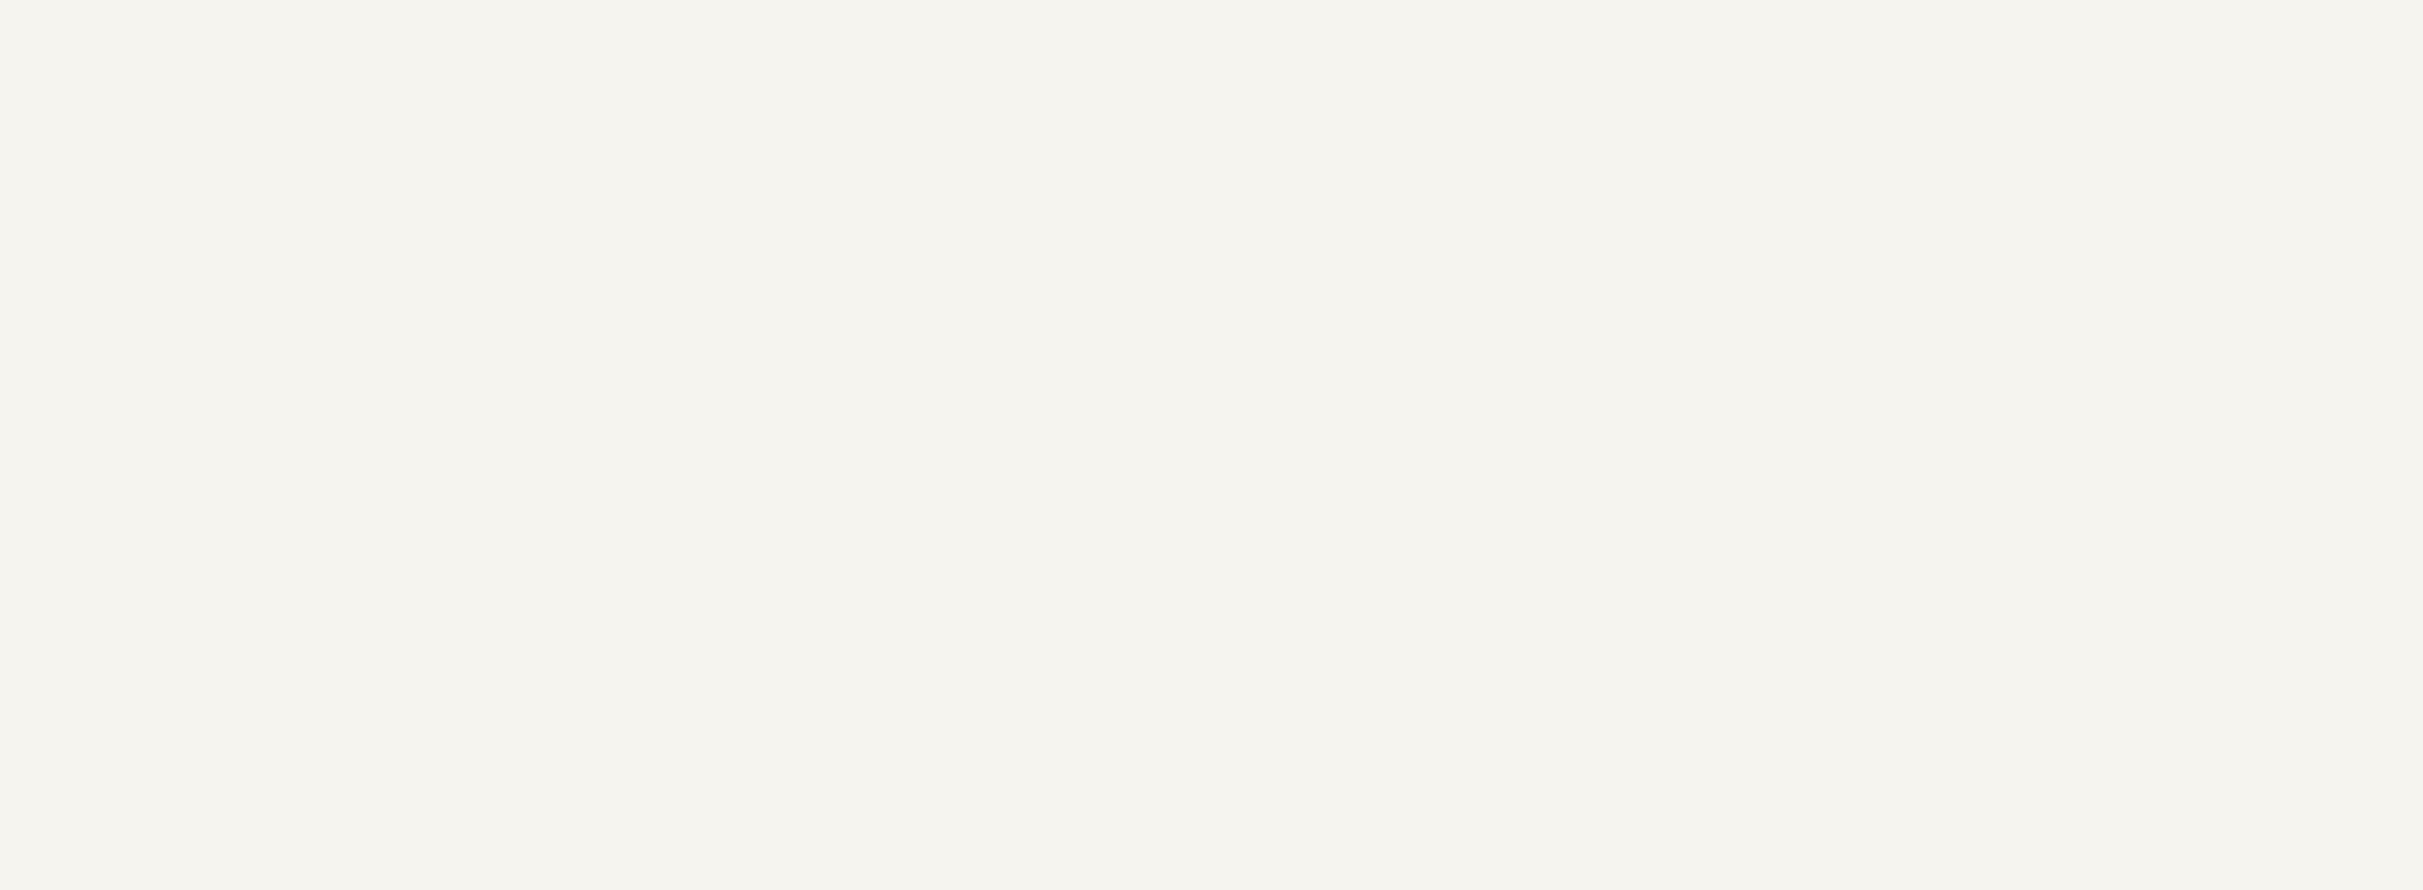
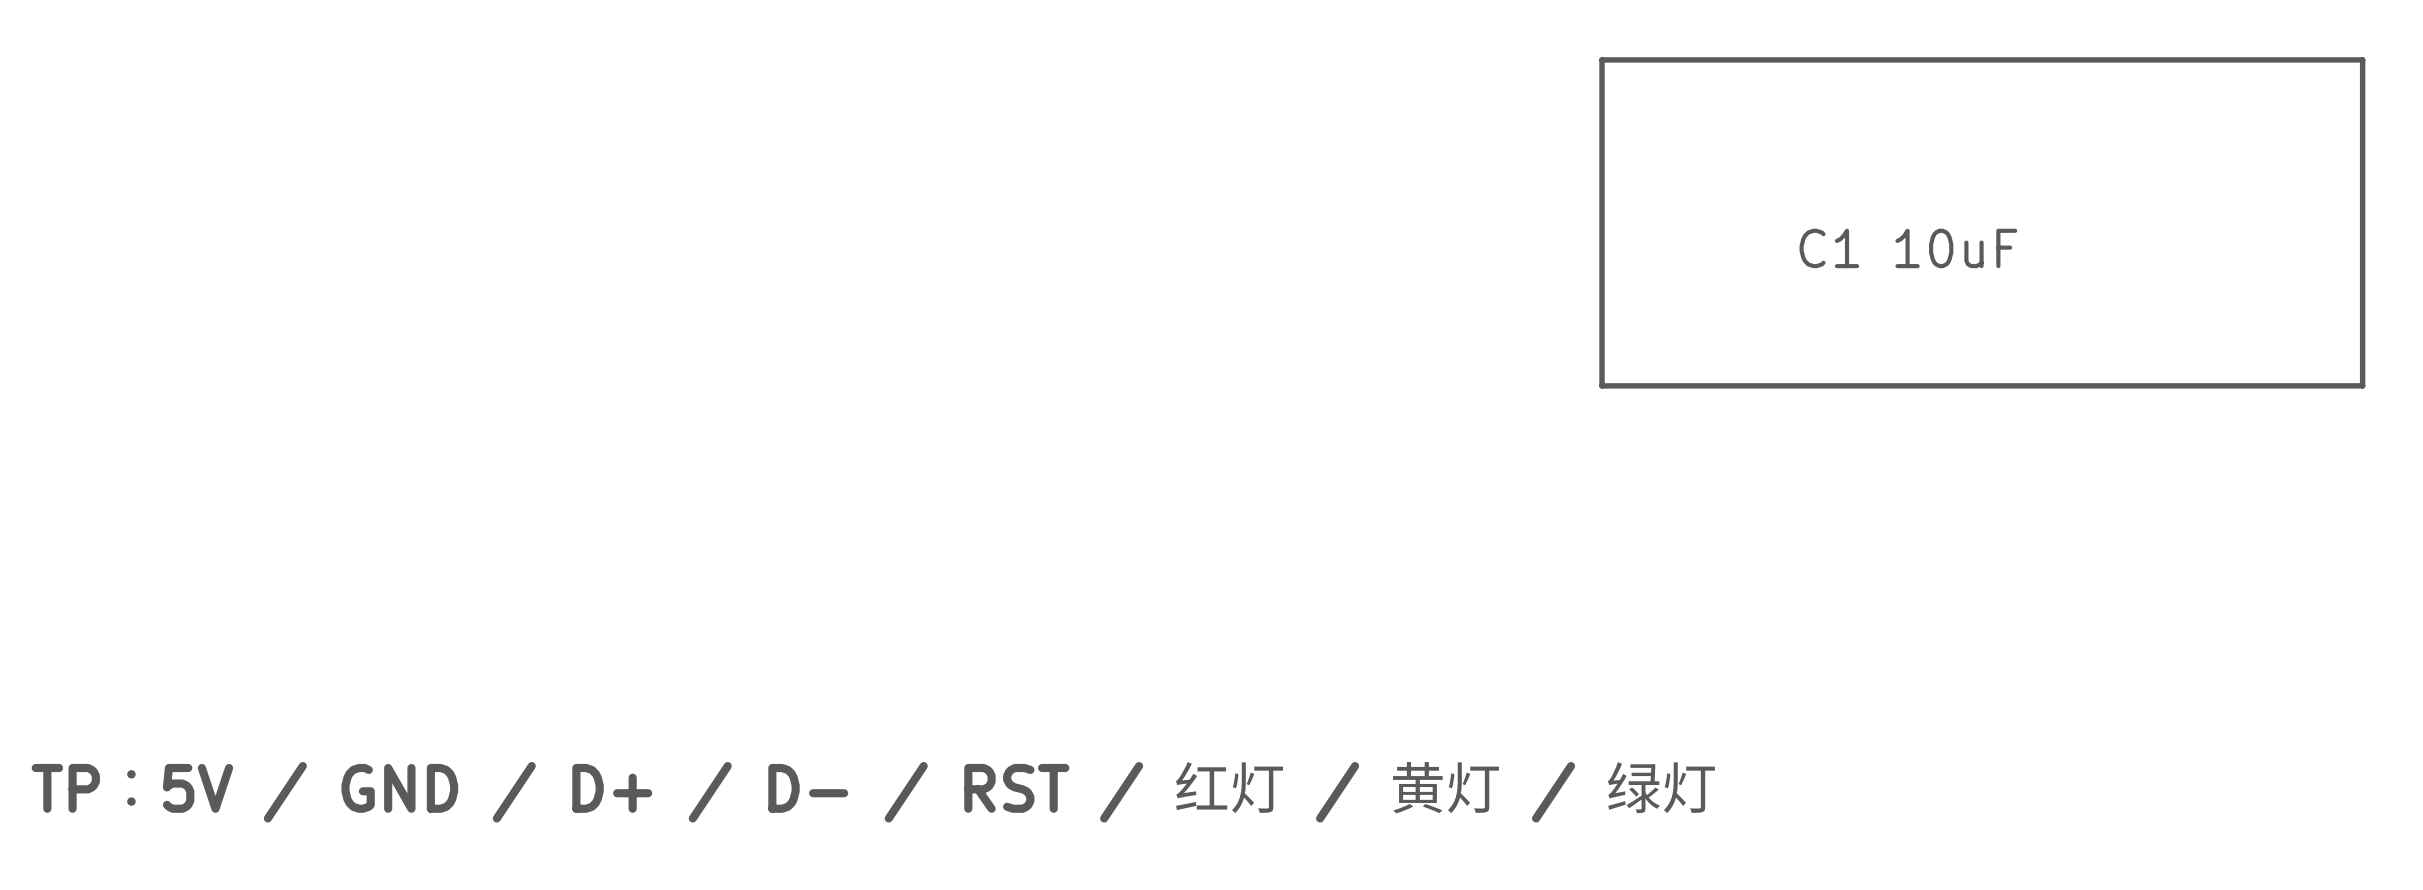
line: none -> (1602, 59) (2362, 59) (2362, 385) (1602, 385) (1602, 59)
text: none -> C1 10uF (1908, 248)
text: none -> TP：5V / GND / D+ / D- / RST / 红灯 / 黄灯 / 绿灯 (875, 790)

